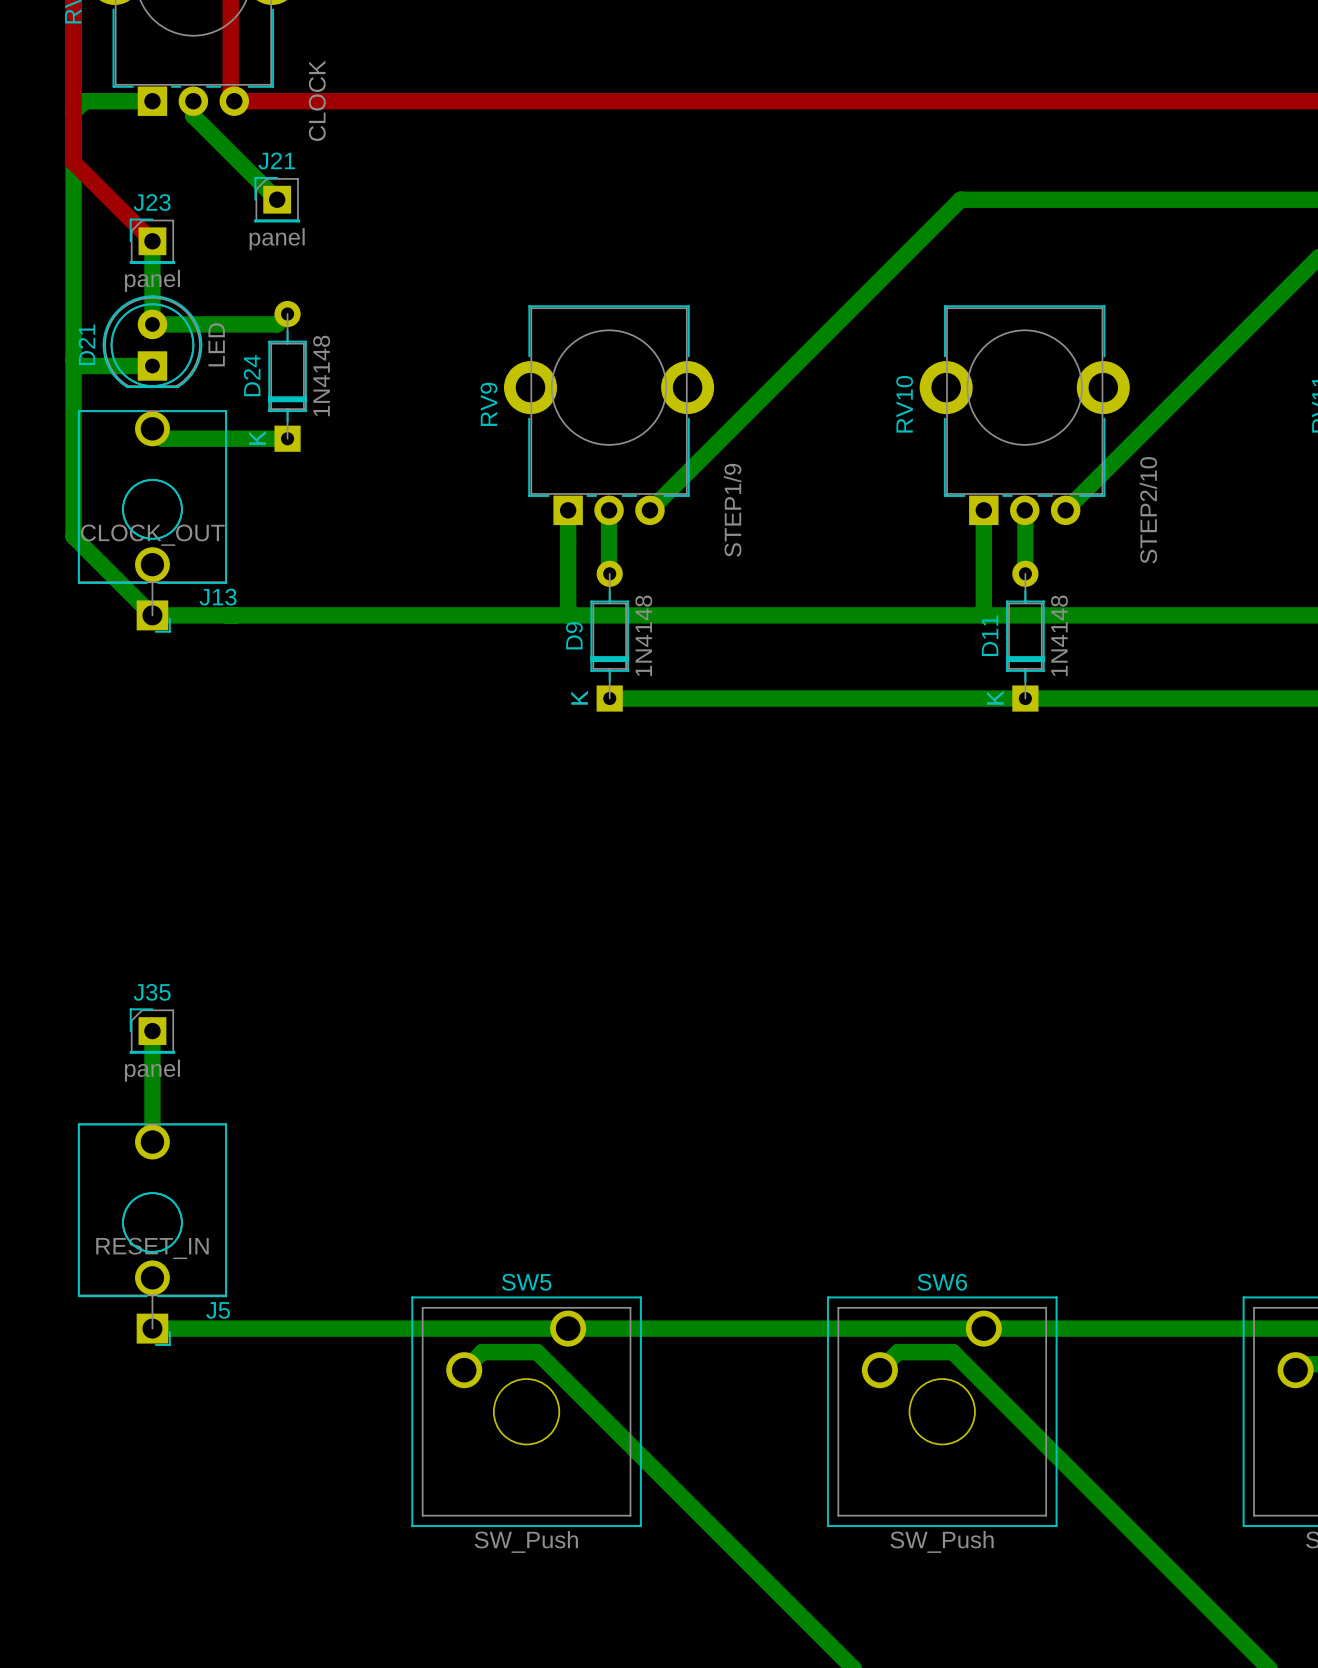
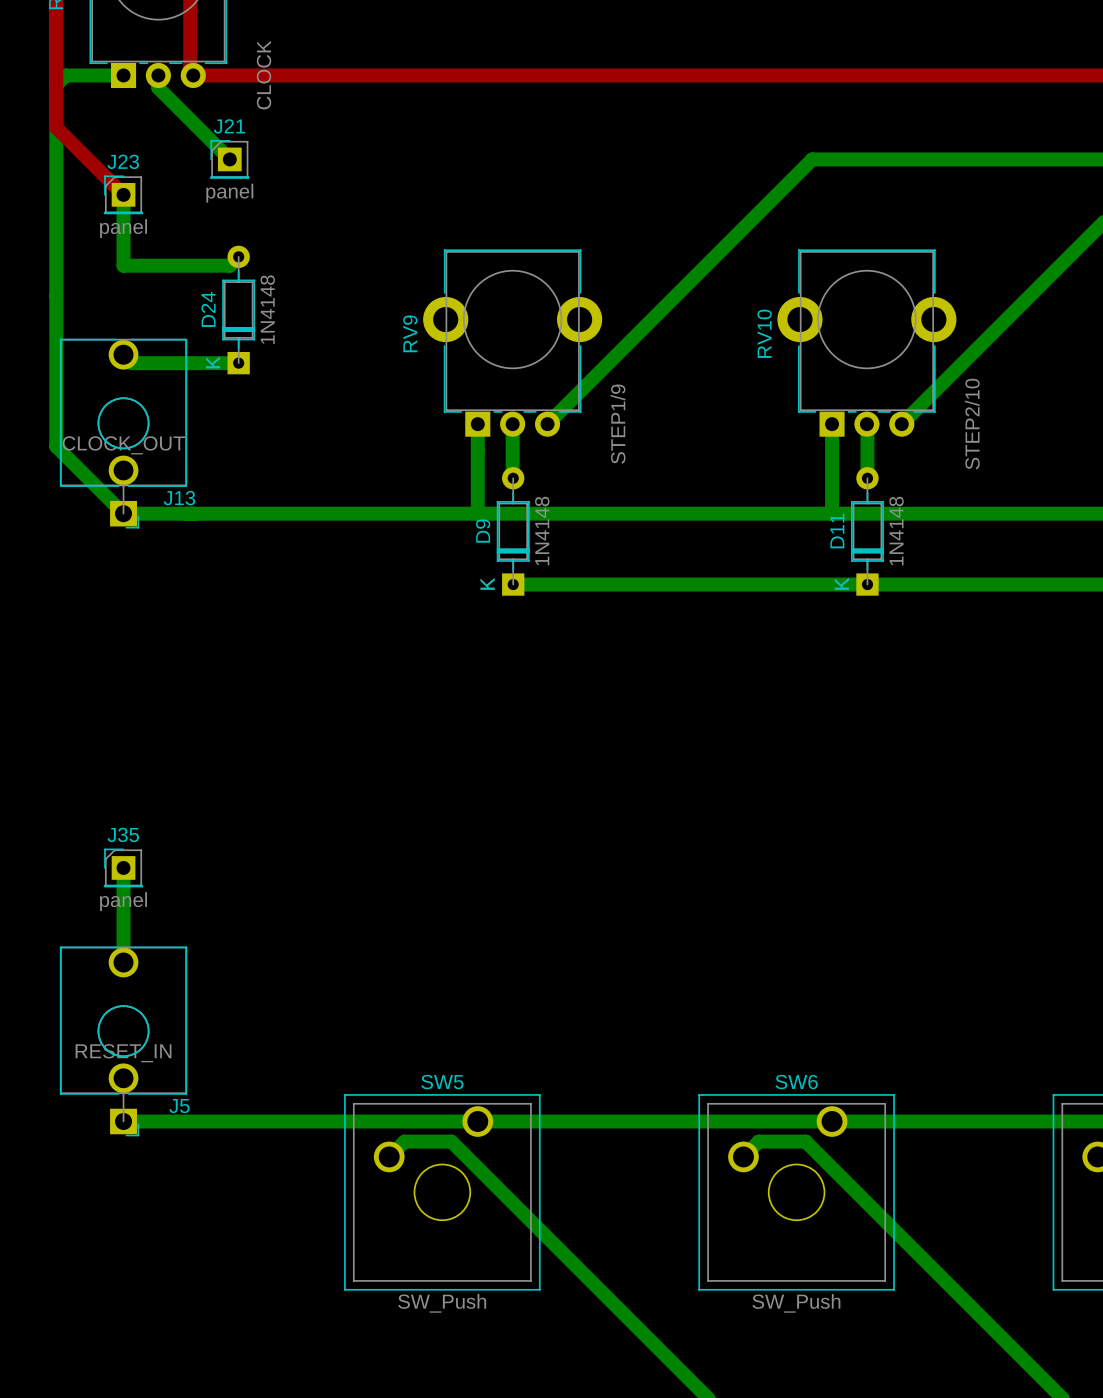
D21: LED (152, 341) -> none
bottom track: (73, 359) (79, 365) (152, 365) -> none

